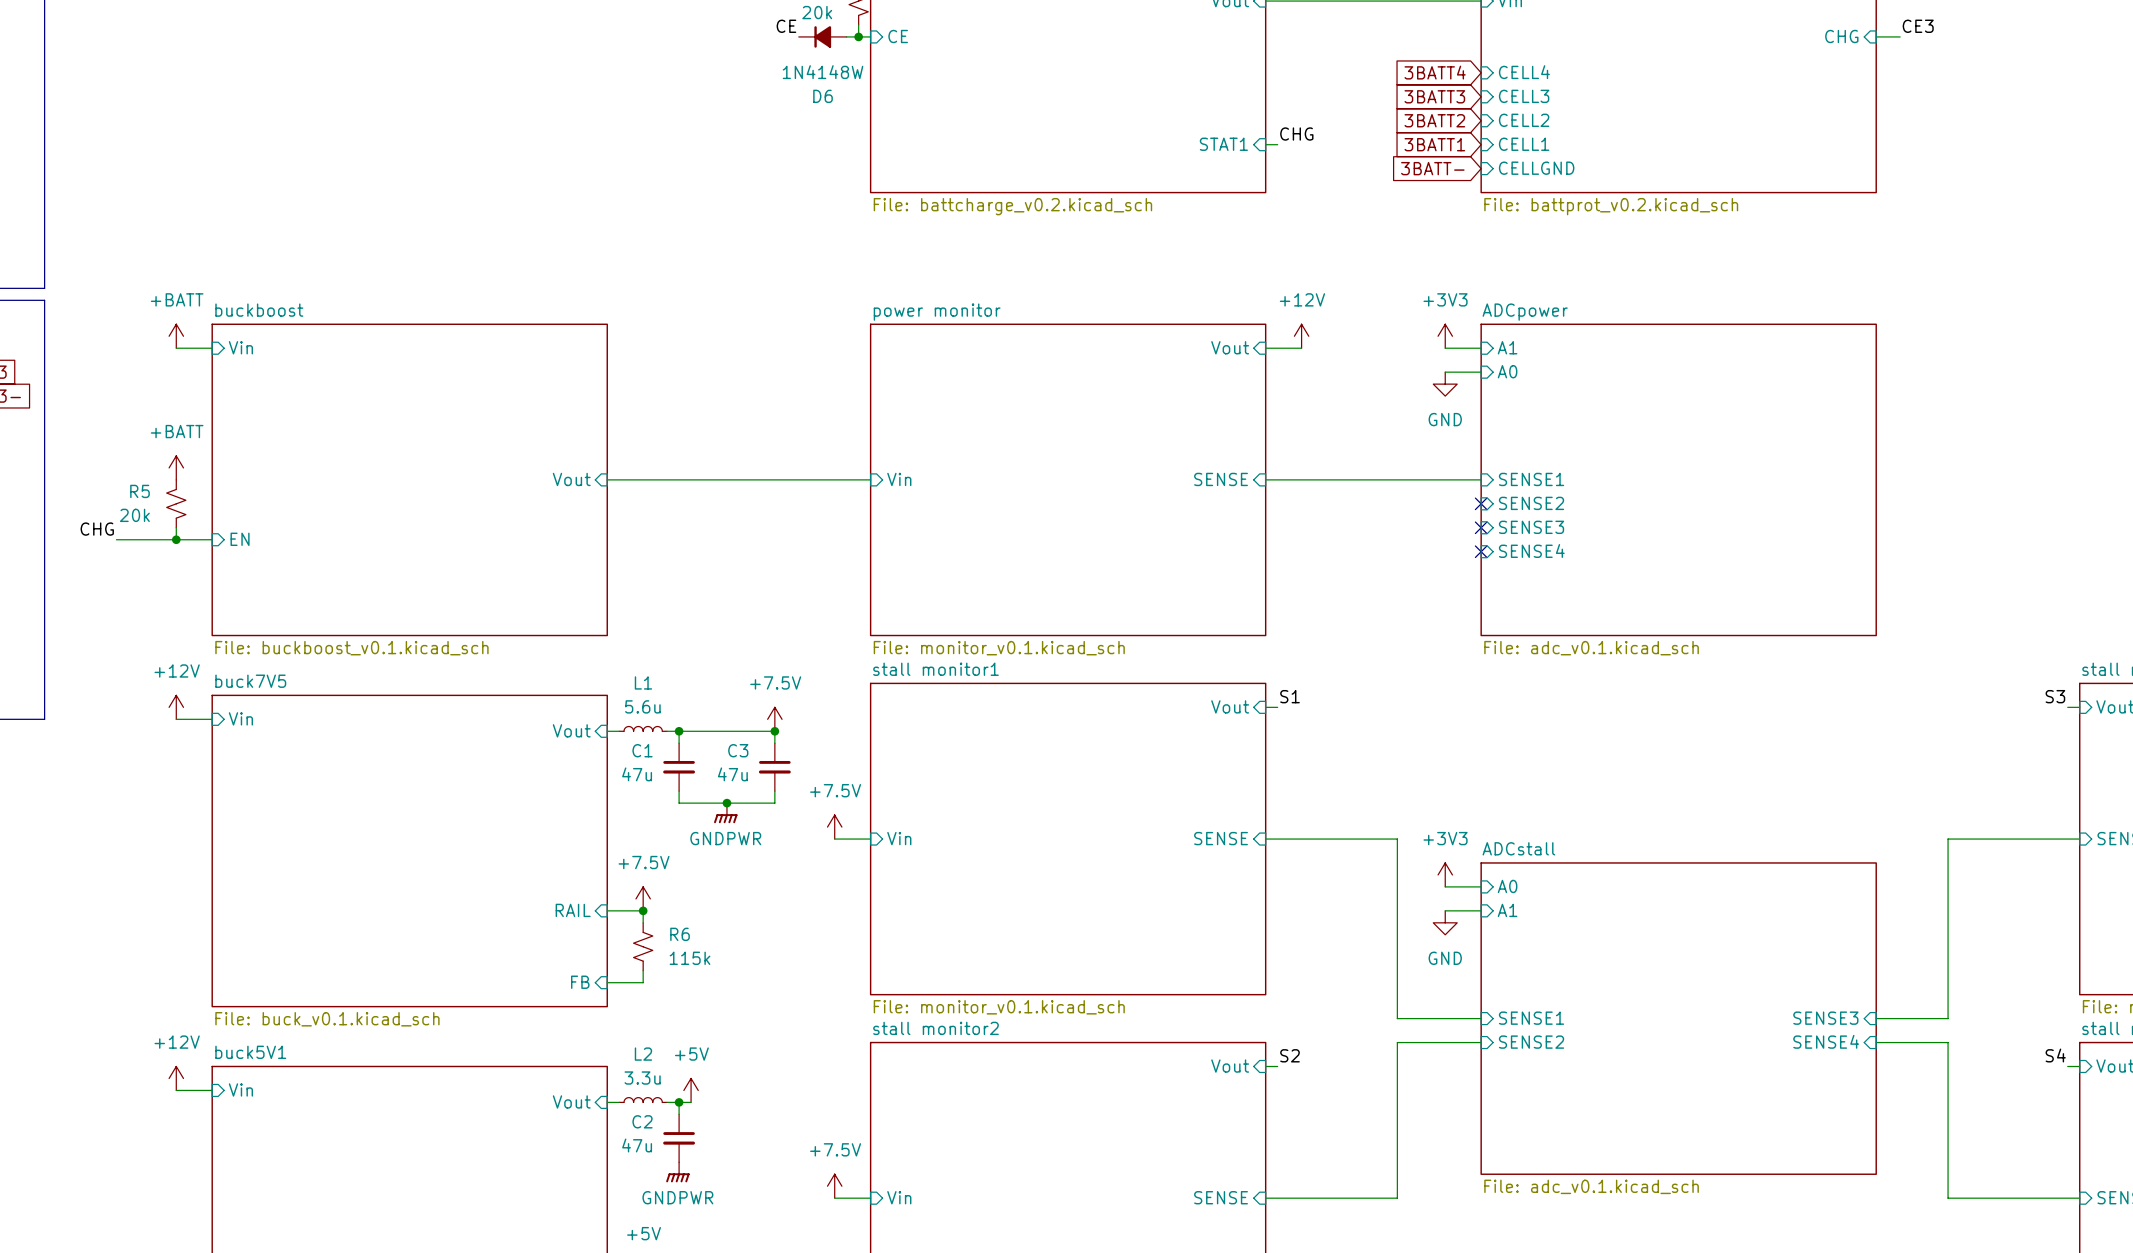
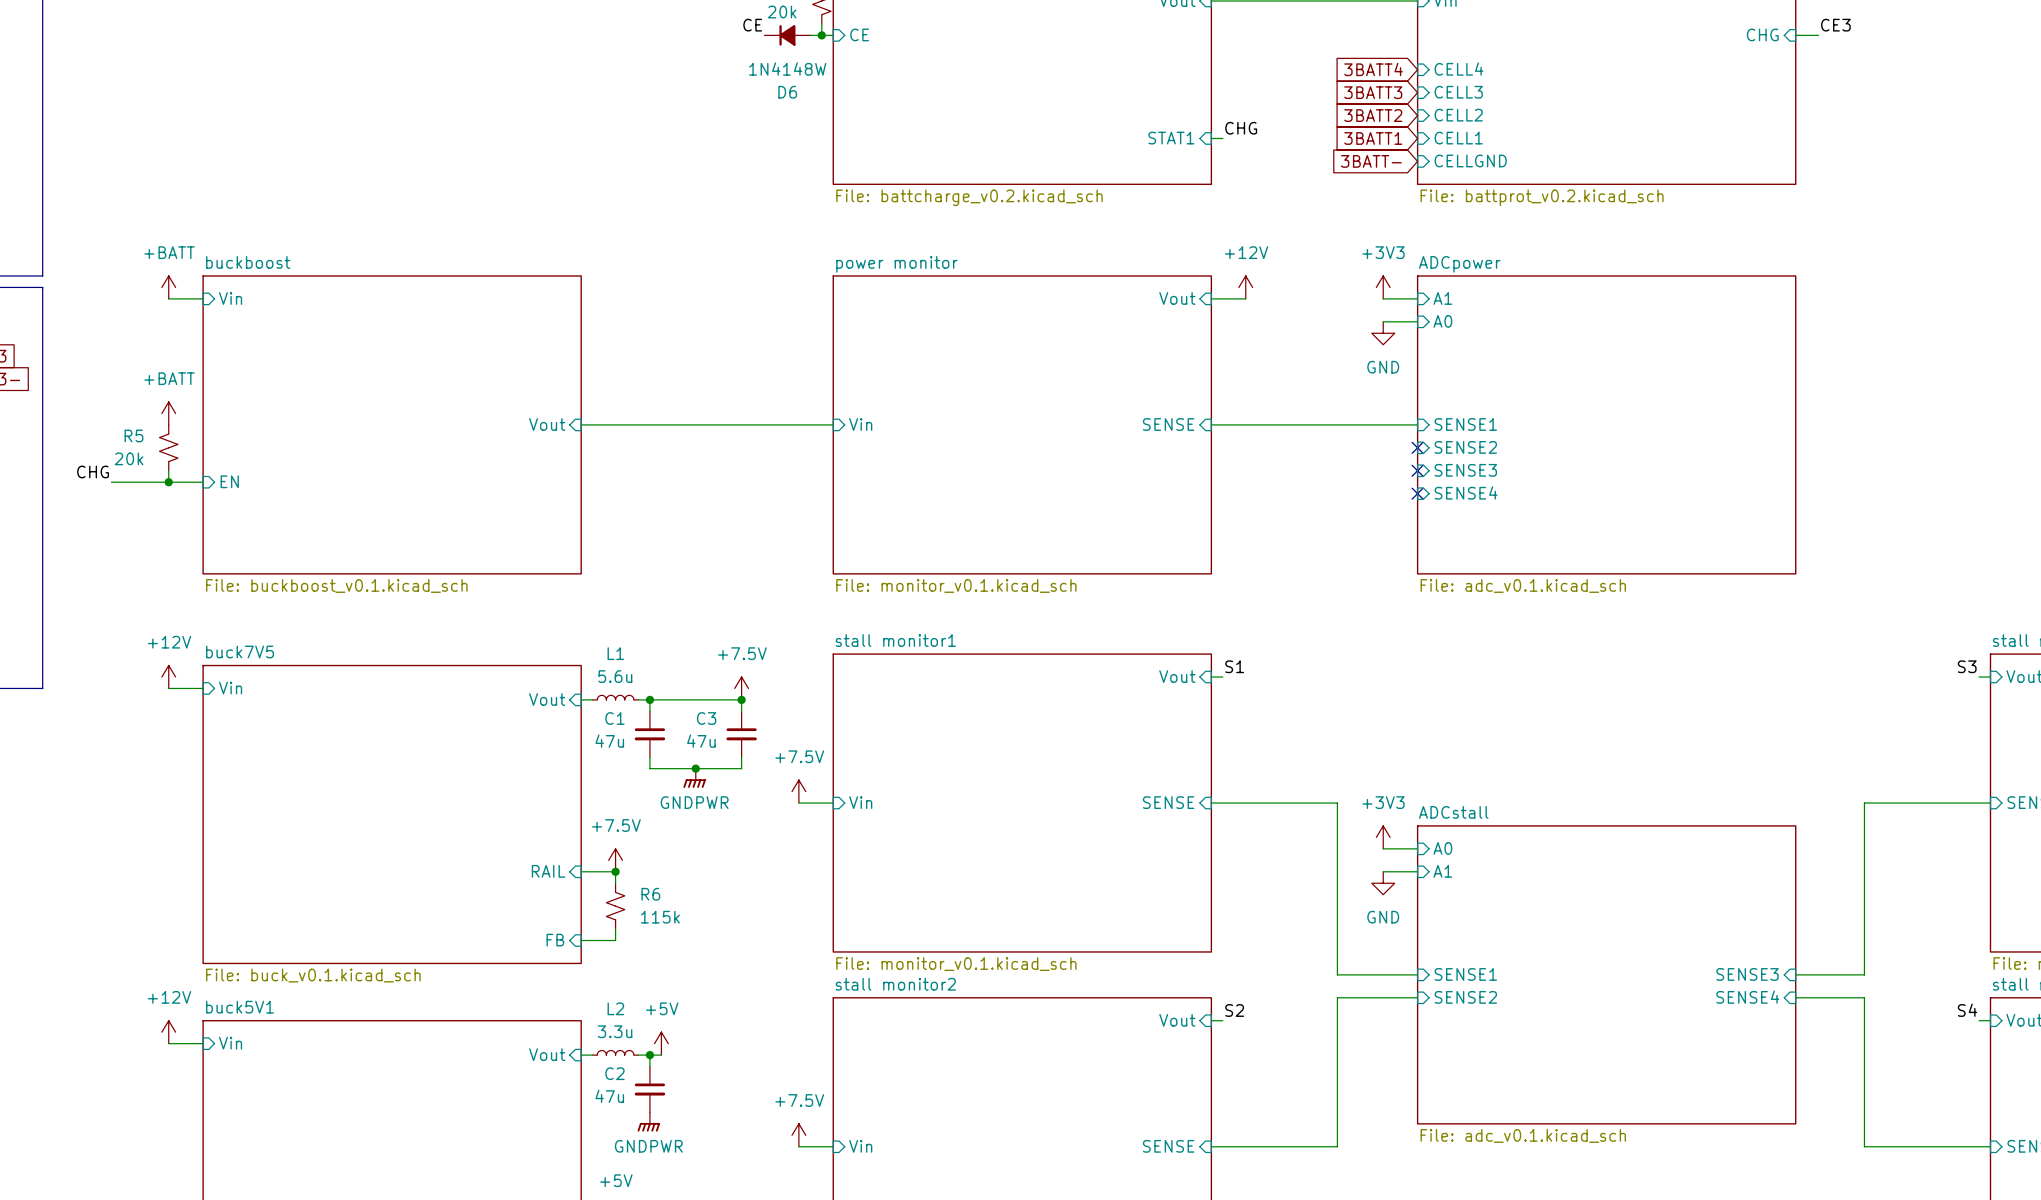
power symbol position: +BATT (176, 336) -> +BATT (168, 287)
power symbol position: +12V (1301, 336) -> +12V (1245, 287)
power symbol position: +3V3 (1445, 336) -> +3V3 (1383, 287)
sheet pin position: Vin (240, 347) -> Vin (230, 298)
sheet pin position: Vout (1230, 347) -> Vout (1177, 298)
sheet pin position: A1 (1507, 347) -> A1 (1442, 298)
wire: (176, 348) (212, 348) -> (168, 298) (203, 298)
wire: (1265, 348) (1301, 348) -> (1211, 298) (1245, 298)
wire: (1445, 348) (1481, 348) -> (1383, 298) (1417, 298)
sheet pin position: A0 (1507, 371) -> A0 (1442, 321)
wire: (1445, 372) (1481, 372) -> (1383, 321) (1417, 321)
power symbol position: GND (1445, 384) -> GND (1383, 333)
power symbol position: +BATT (176, 467) -> +BATT (168, 413)
no-connect mark: none -> (1417, 447)
sheet buckboost position: (409, 479) -> (392, 424)
sheet pin position: Vout (571, 479) -> Vout (547, 424)
wire: (607, 479) (870, 479) -> (581, 424) (833, 424)
sheet pin position: Vin (899, 479) -> Vin (860, 424)
sheet power monitor position: (1068, 479) -> (1022, 424)
sheet pin position: SENSE (1221, 479) -> SENSE (1168, 424)
wire: (1265, 479) (1481, 479) -> (1211, 424) (1417, 424)
sheet pin position: SENSE1 (1531, 479) -> SENSE1 (1465, 424)
sheet ADCpower position: (1678, 479) -> (1606, 424)
no-connect mark: none -> (1417, 470)
R5 position: (176, 503) -> (168, 447)
no-connect mark: (1481, 503) -> none
sheet pin position: SENSE2 (1531, 503) -> SENSE2 (1465, 447)
no-connect mark: none -> (1417, 493)
wire: (176, 527) (176, 539) -> (168, 470) (168, 482)
no-connect mark: (1481, 527) -> none
sheet pin position: SENSE3 (1531, 527) -> SENSE3 (1465, 470)
label position: CHG (97, 529) -> CHG (93, 471)
wire: (116, 539) (212, 539) -> (111, 482) (203, 482)
junction position: (176, 539) -> (168, 482)
sheet pin position: EN (240, 539) -> EN (229, 481)
sheet pin position: SENSE4 (1531, 550) -> SENSE4 (1466, 492)
no-connect mark: (1481, 551) -> none

